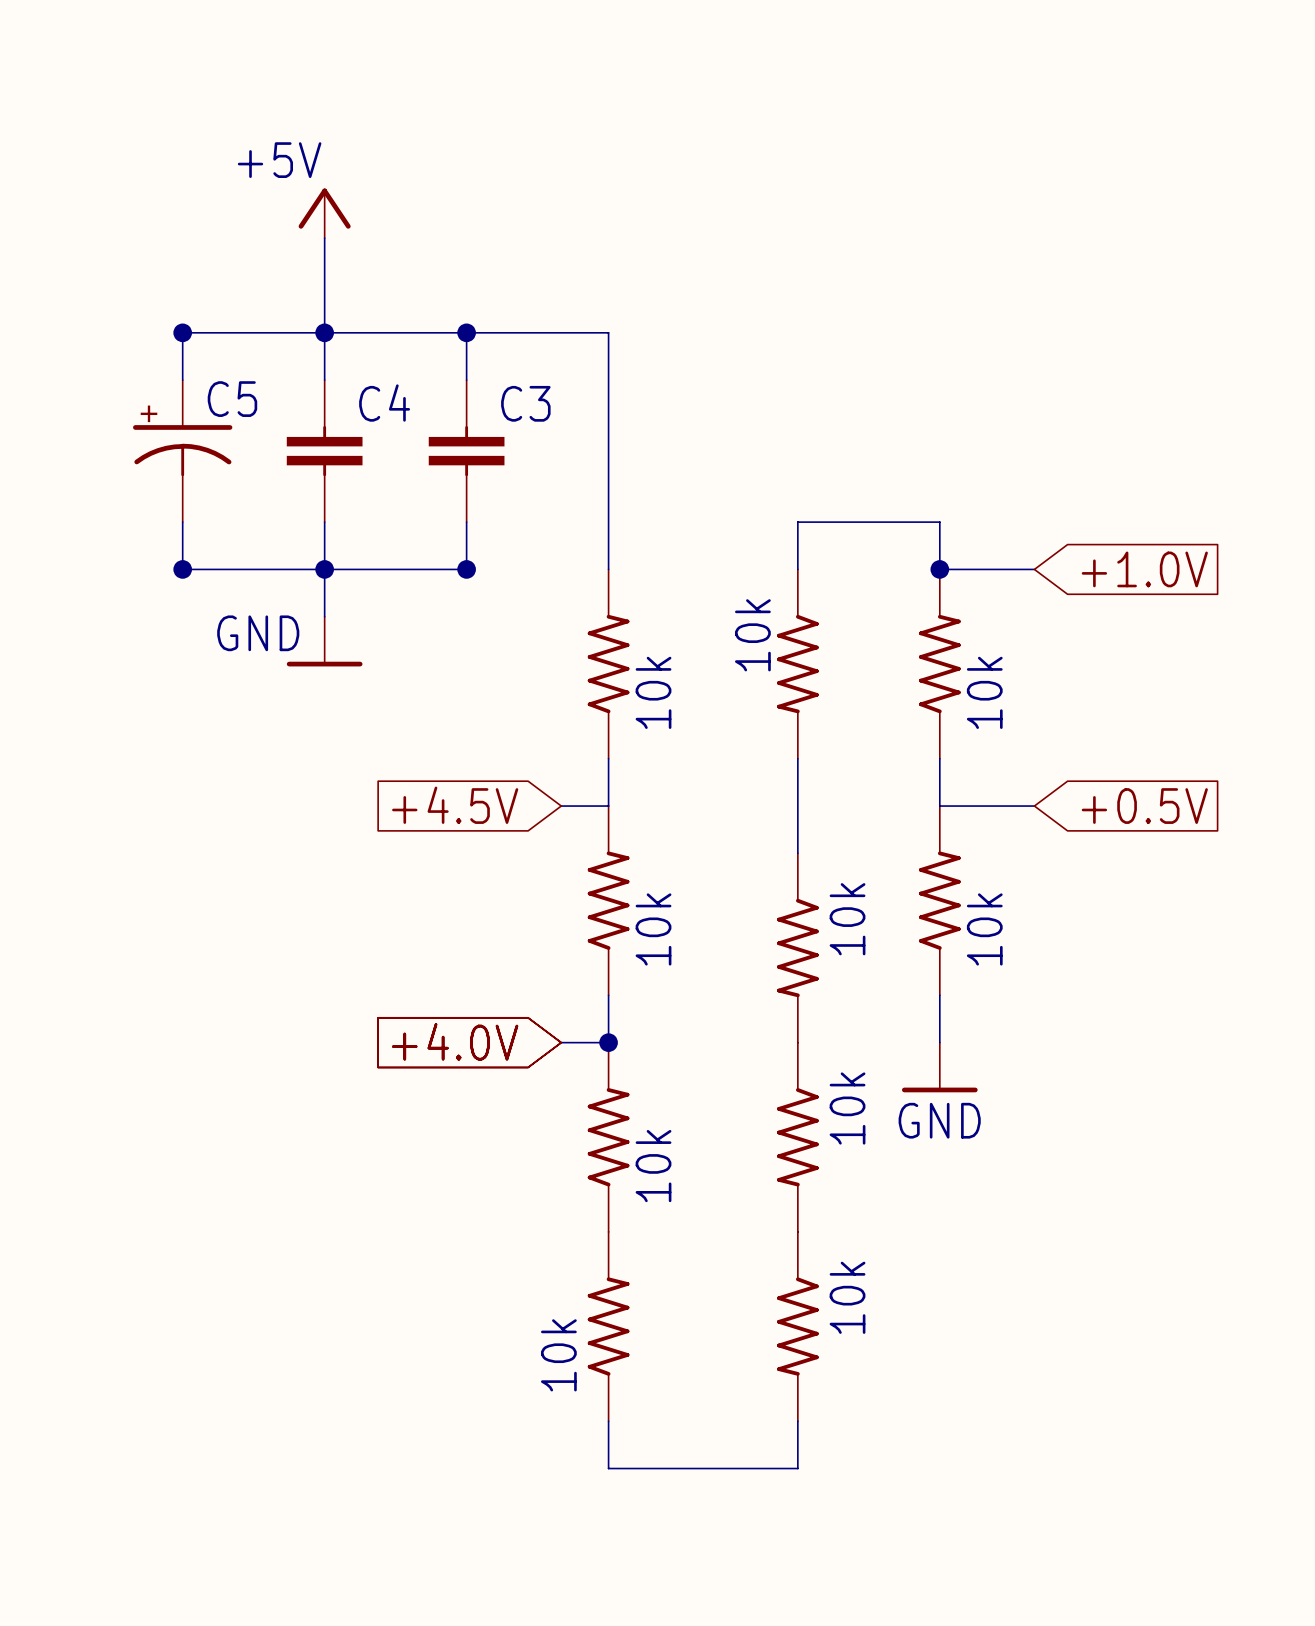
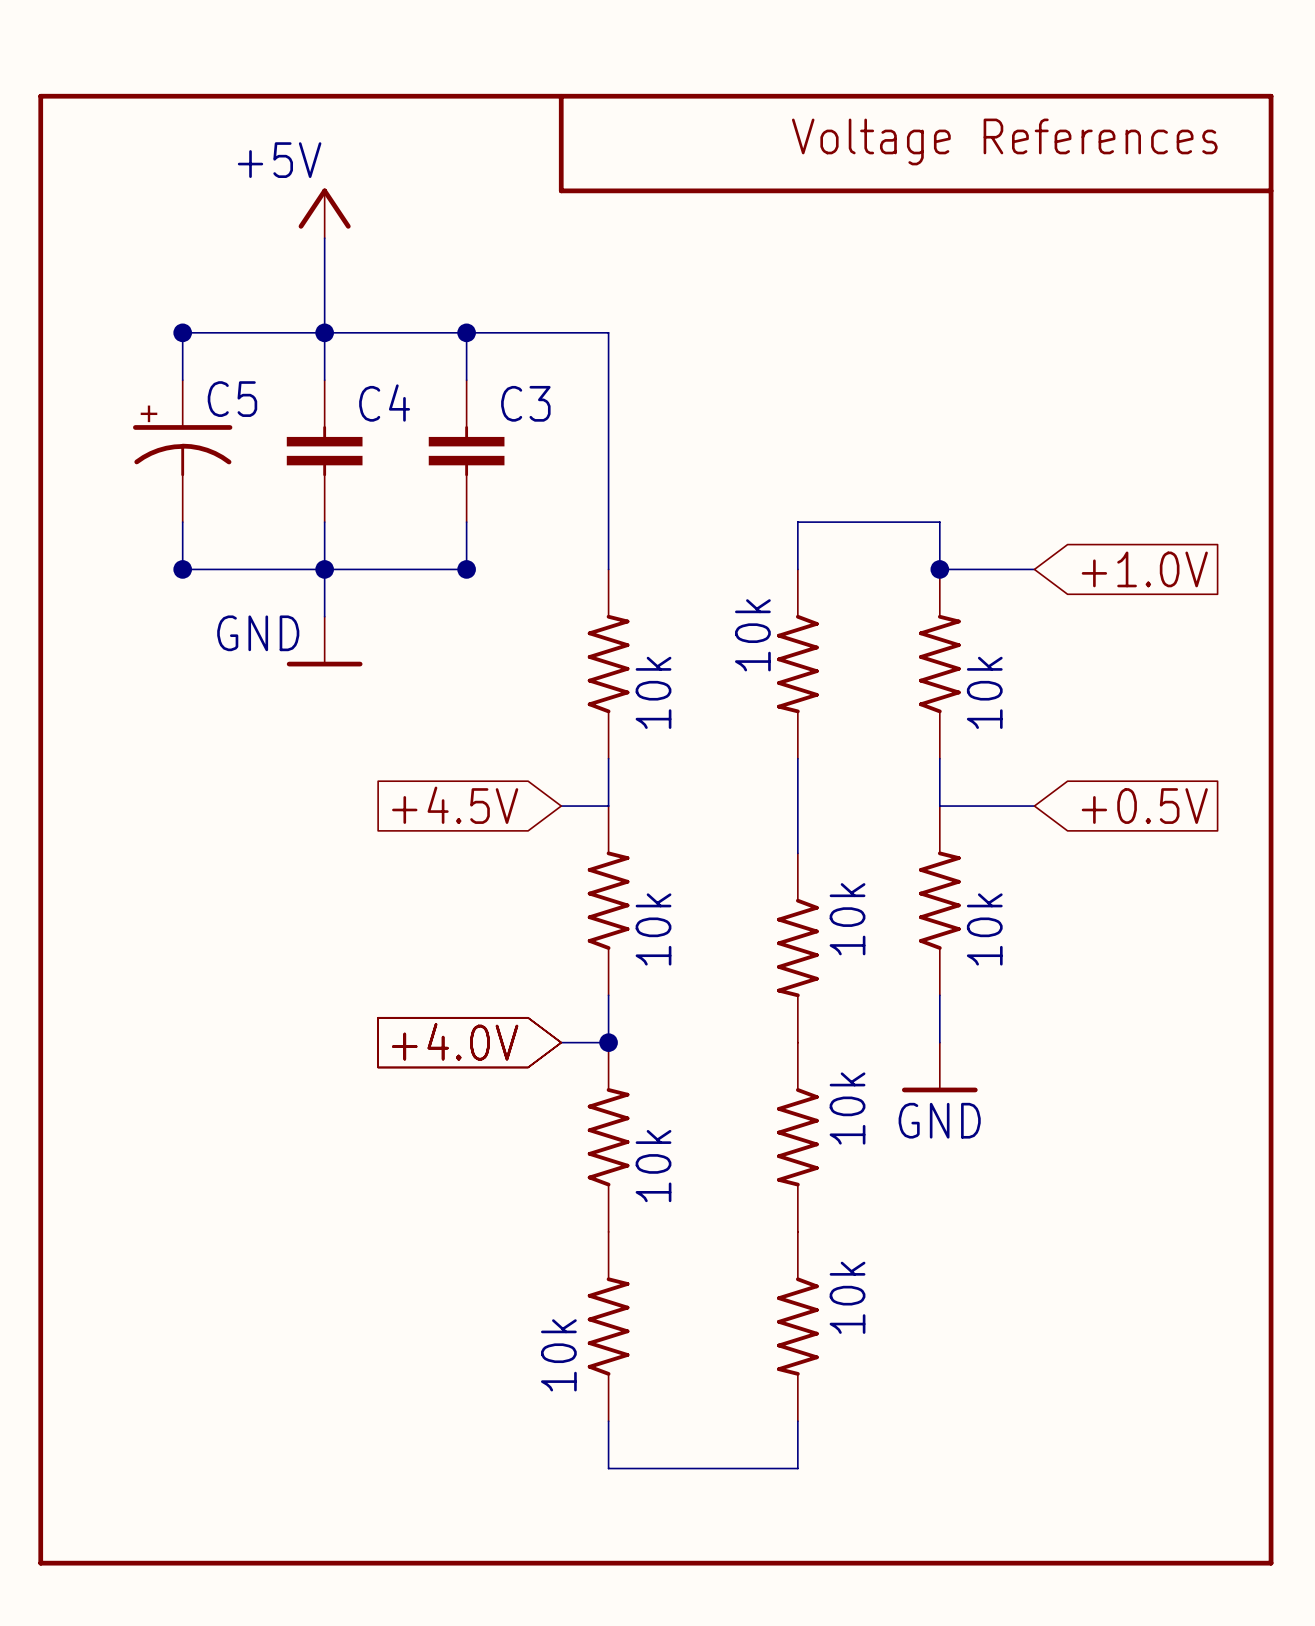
line: none -> (40, 96) (40, 1563) (1271, 1563) (1271, 96) (40, 96)
line: none -> (561, 96) (561, 190) (1271, 190)
text: none -> Voltage References (1004, 141)

